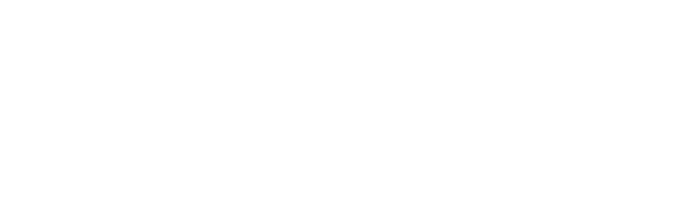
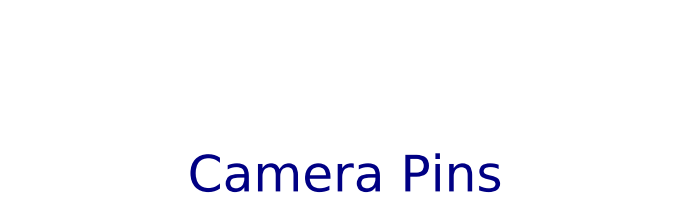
text: none -> Camera Pins (345, 172)

